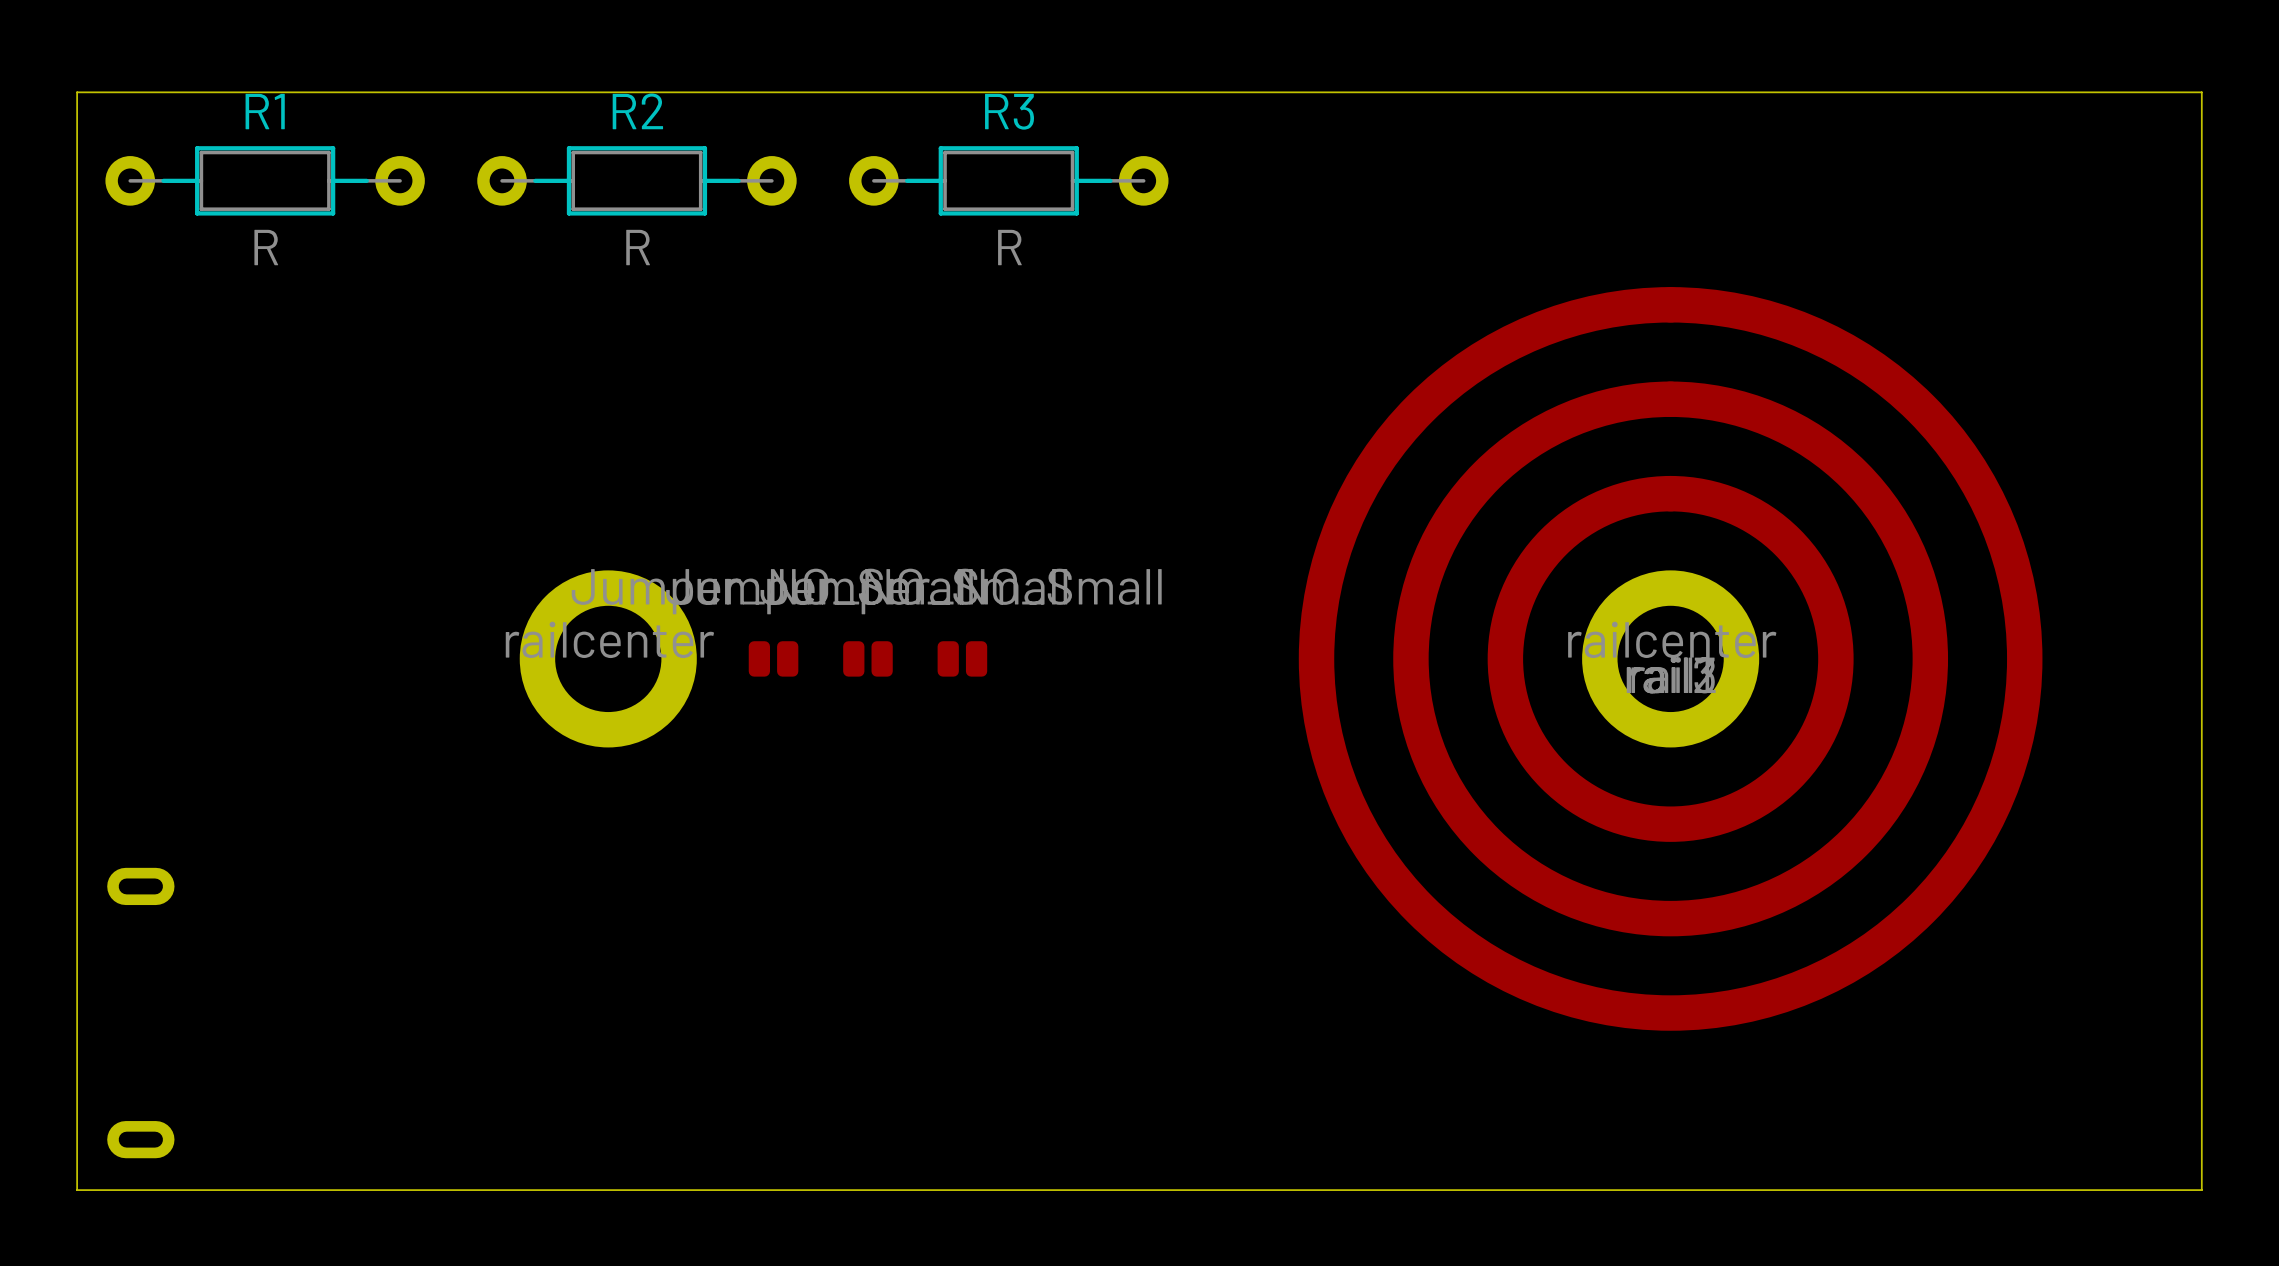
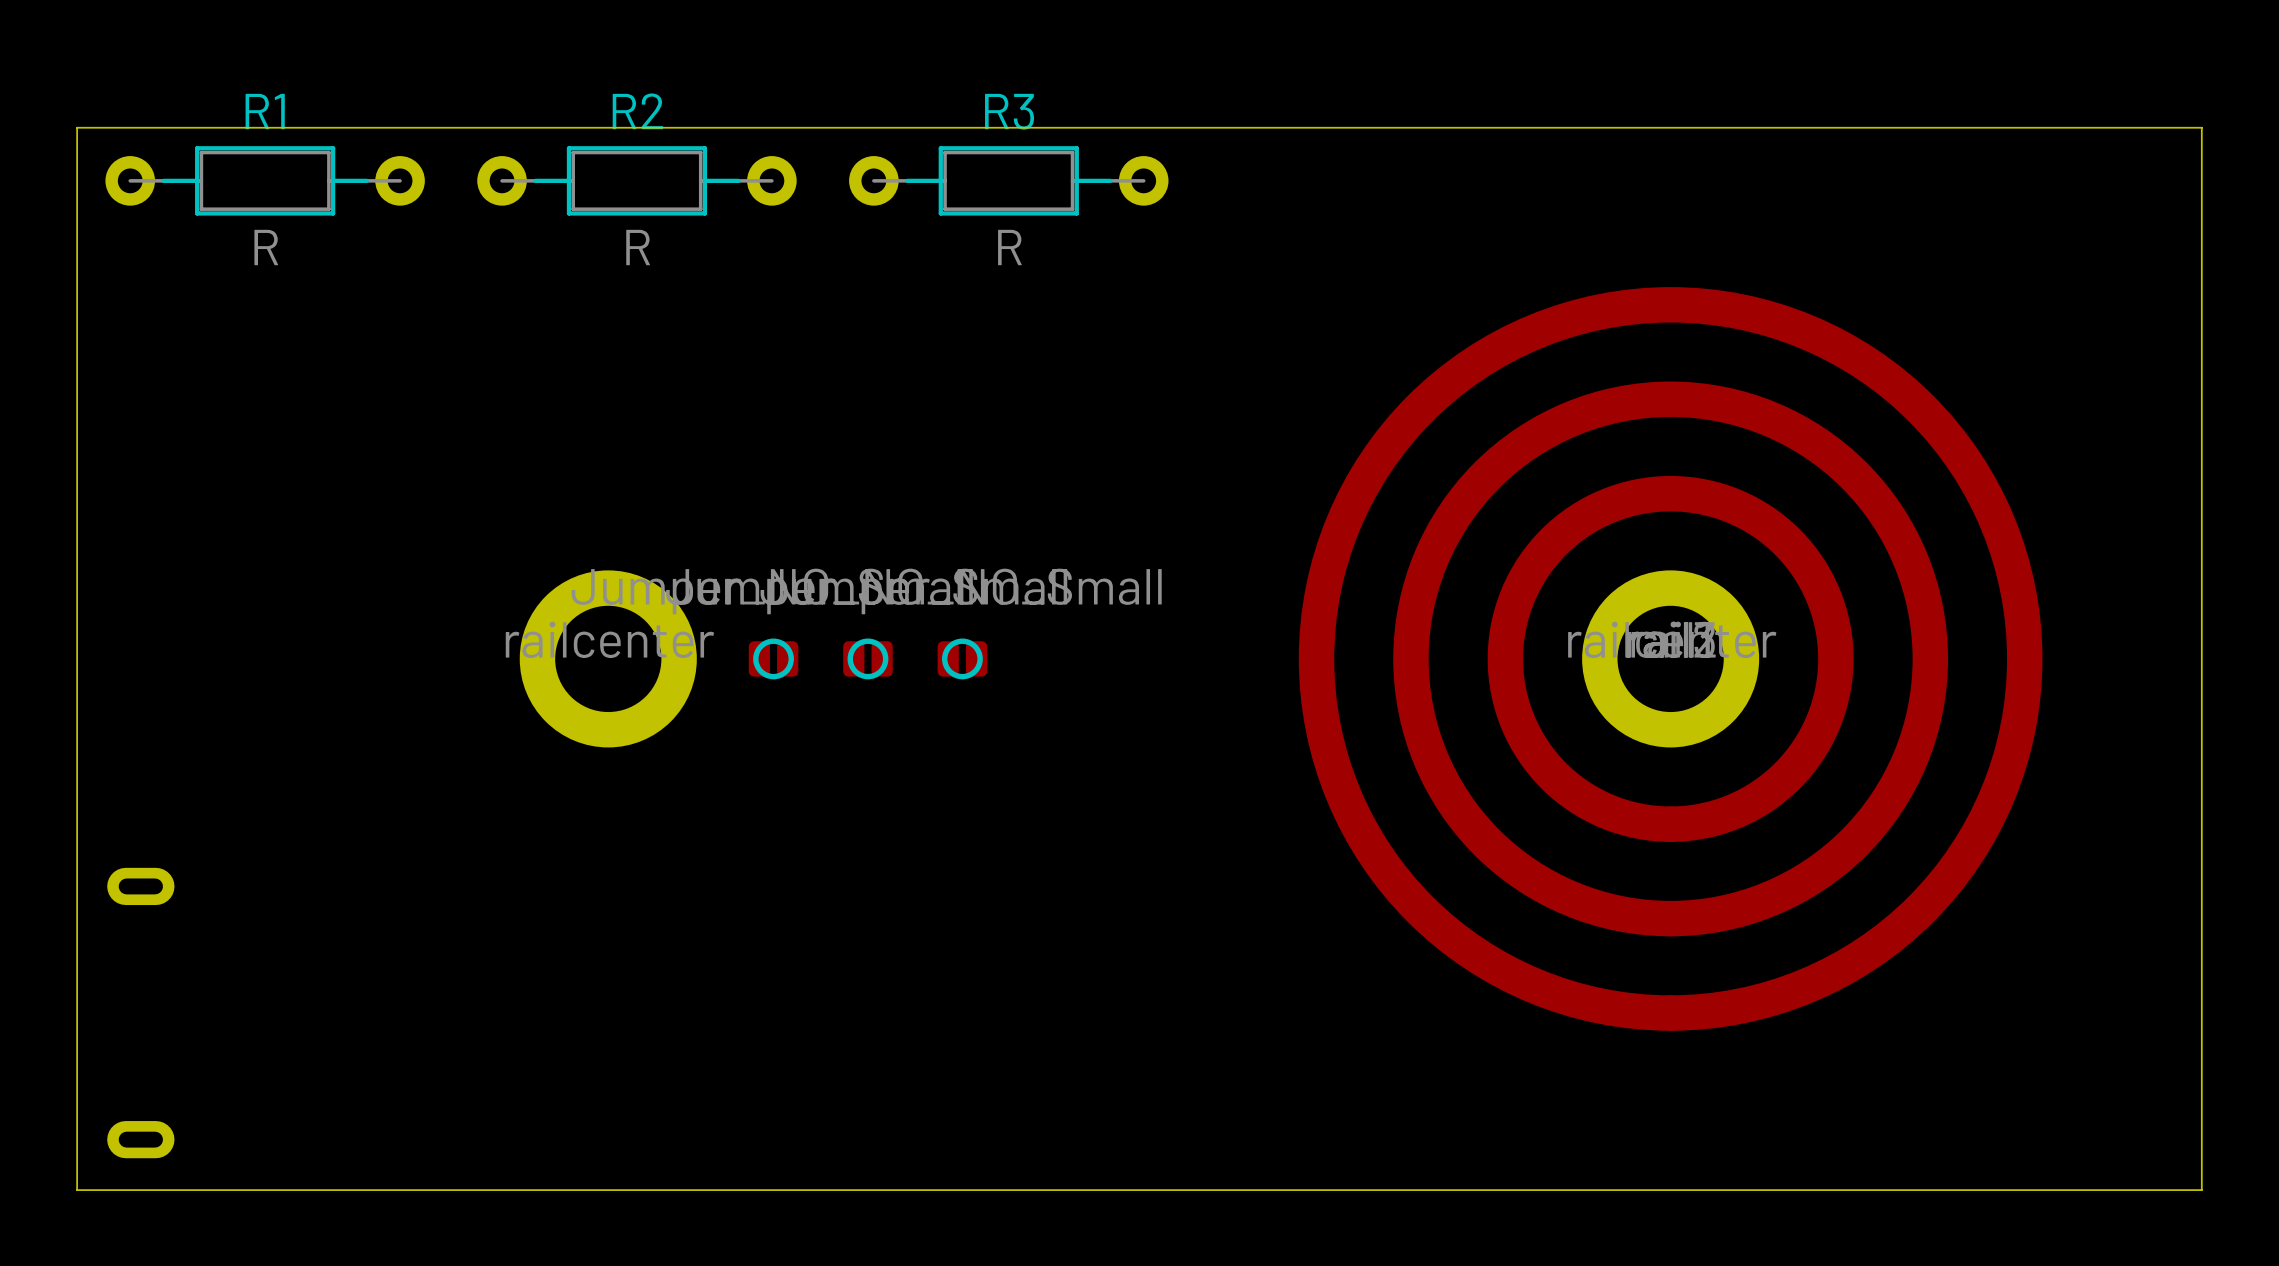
board edge: (77, 127) (77, 92) (2201, 92) (2201, 127) -> (77, 127) (2201, 127)
part footprint: [748, 641, 799, 677] -> [748, 638, 799, 680]
part footprint: [843, 641, 893, 677] -> [843, 638, 893, 680]
part footprint: [937, 641, 988, 677] -> [937, 638, 988, 680]
part rotation: 0° (1670, 658) -> 180° (1670, 658)
part rotation: 0° (1670, 658) -> 180° (1670, 658)
part rotation: 0° (1670, 658) -> 180° (1670, 658)

